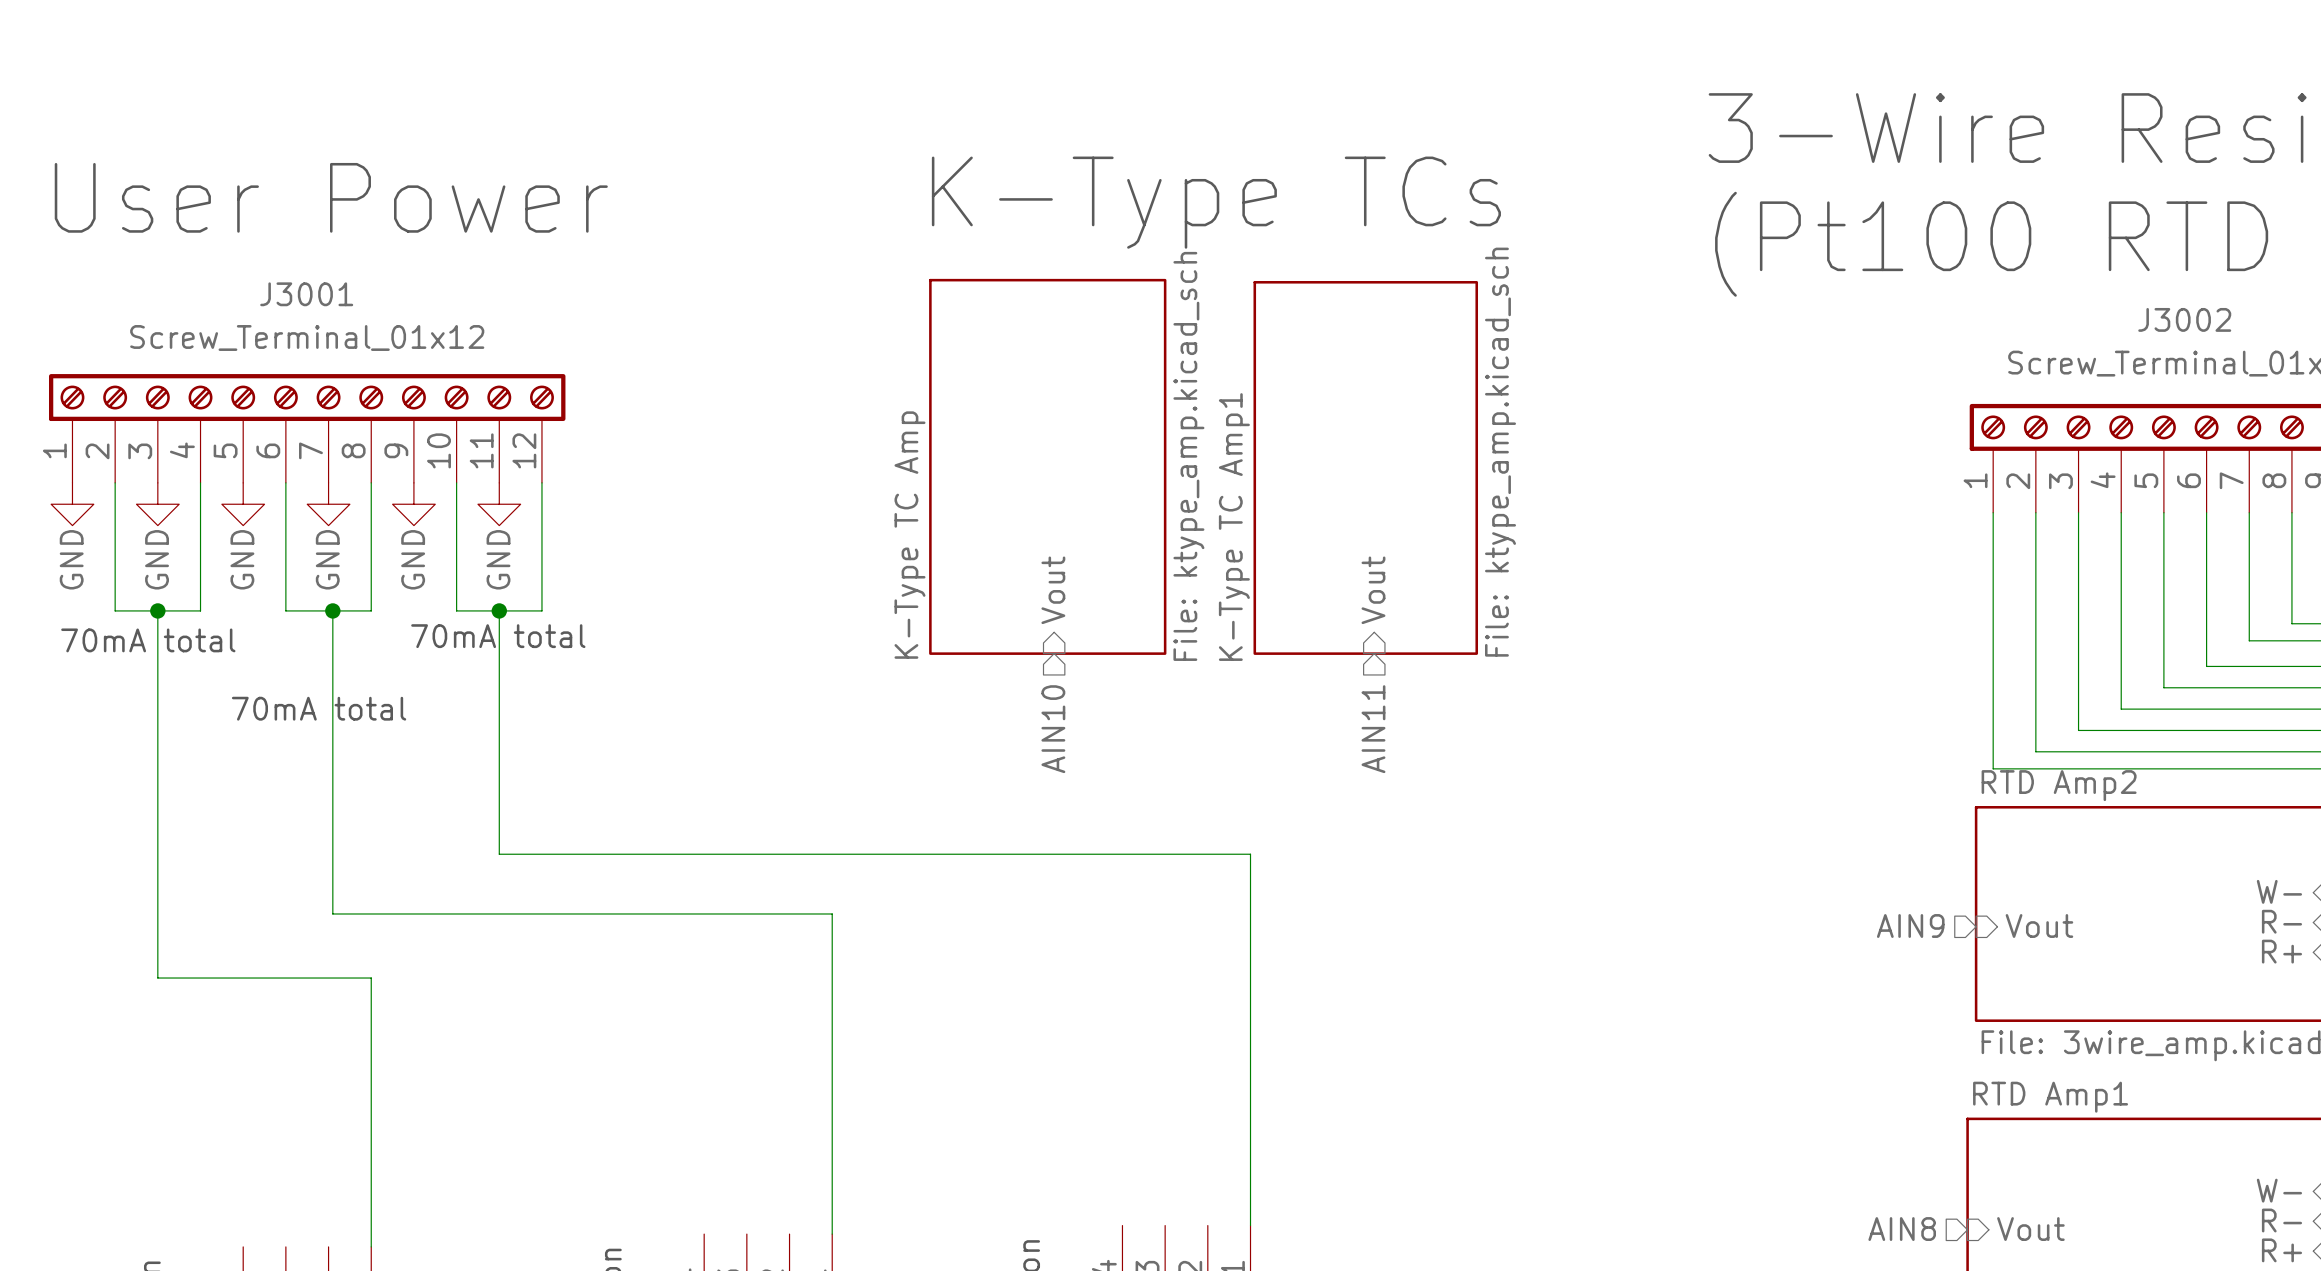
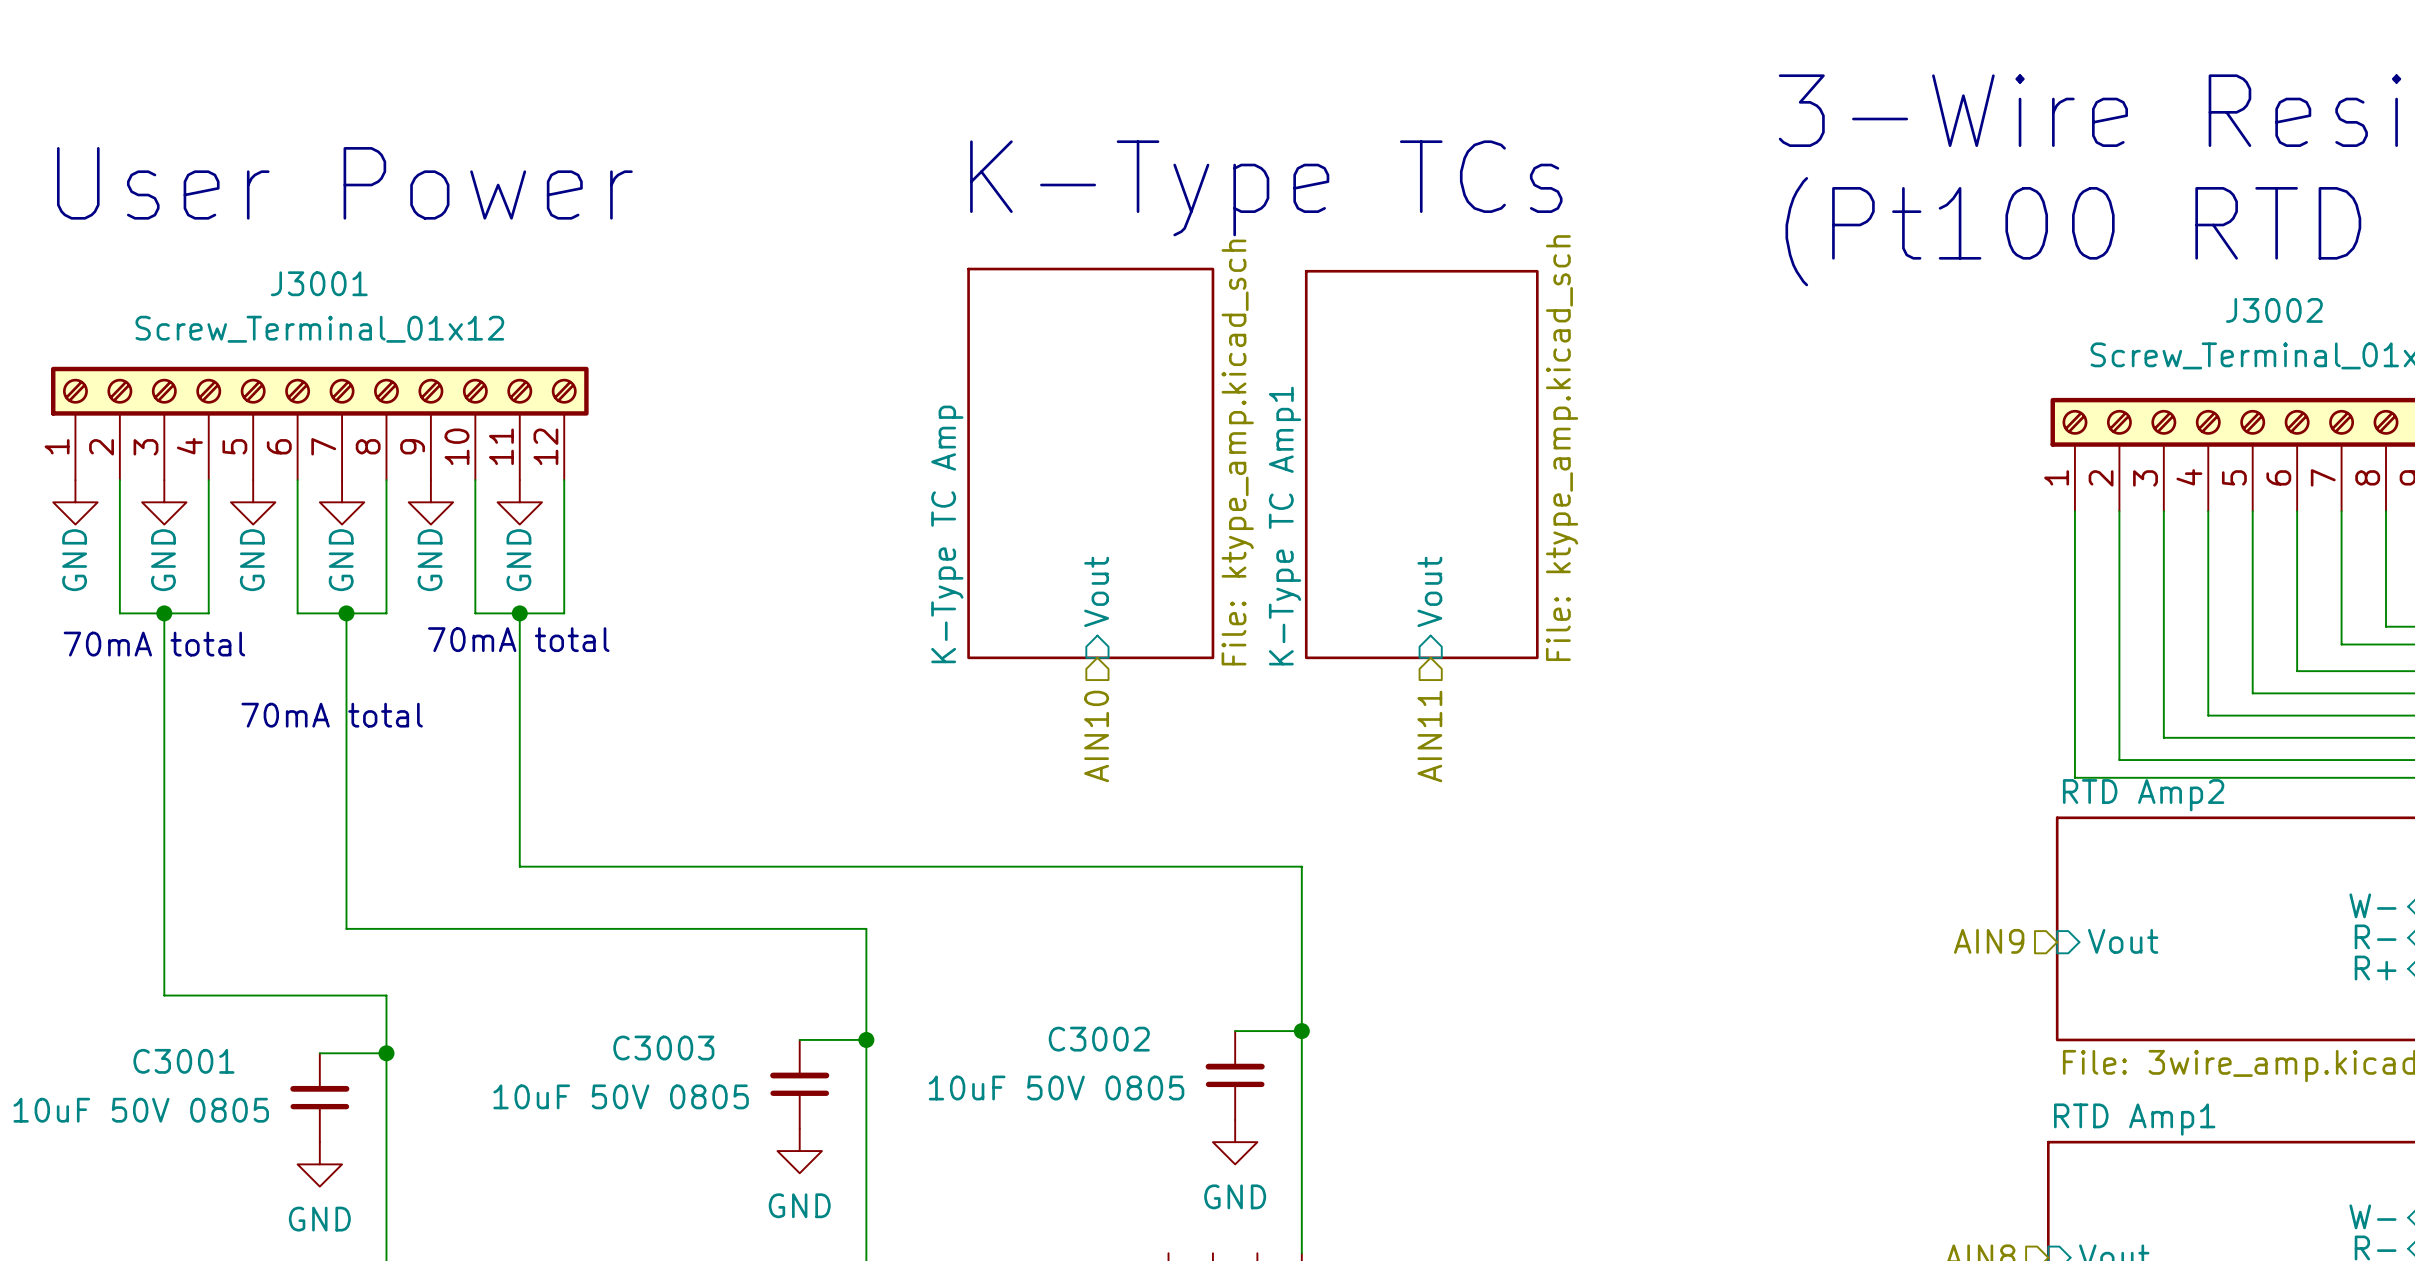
wire: none -> (1235, 1031) (1301, 1031)
junction: none -> (1301, 1031)
wire: none -> (799, 1039) (866, 1039)
junction: none -> (866, 1039)
wire: none -> (319, 1053) (386, 1053)
junction: none -> (386, 1053)
C3002: none -> 10uF 50V 0805 (1235, 1075)
C3003: none -> 10uF 50V 0805 (799, 1084)
C3001: none -> 10uF 50V 0805 (319, 1097)
power symbol: none -> GND (1235, 1142)
power symbol: none -> GND (799, 1151)
power symbol: none -> GND (319, 1164)

